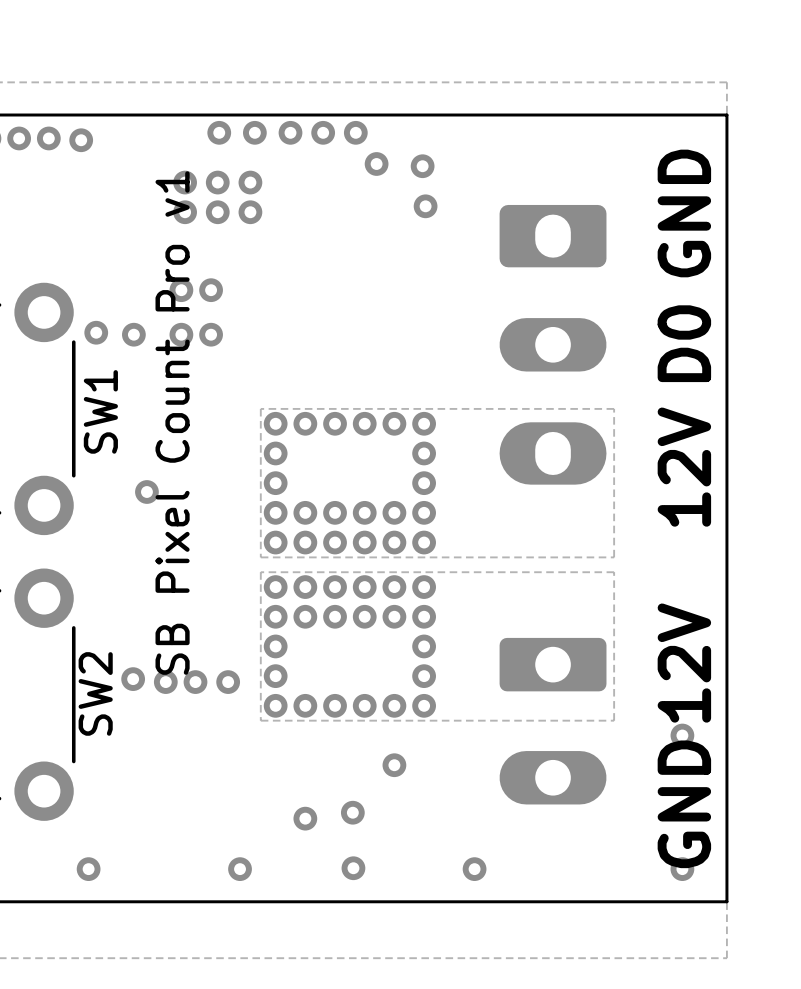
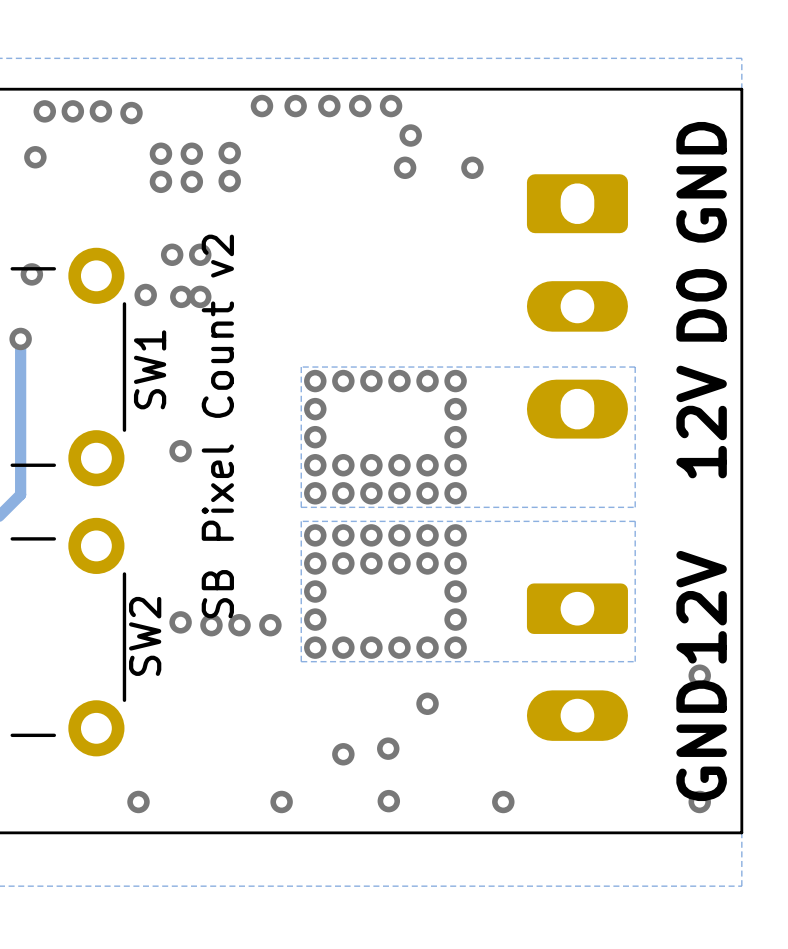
via: (422, 166) -> none
via: (217, 182) -> none
via: (250, 182) -> none
via: none -> (160, 153)
via: none -> (191, 153)
via: none -> (405, 167)
via position: (425, 206) -> (472, 167)
via: none -> (160, 181)
via: none -> (191, 181)
via: (217, 212) -> none
via: (250, 212) -> none
via: none -> (172, 254)
via: none -> (200, 254)
via: (181, 290) -> none
via: (211, 290) -> none
via: none -> (200, 296)
via: (181, 334) -> none
via: (211, 334) -> none
text: SB Pixel Count Pro v1 (172, 423) -> SB Pixel Count v2 (217, 426)
via position: (146, 492) -> (180, 451)

